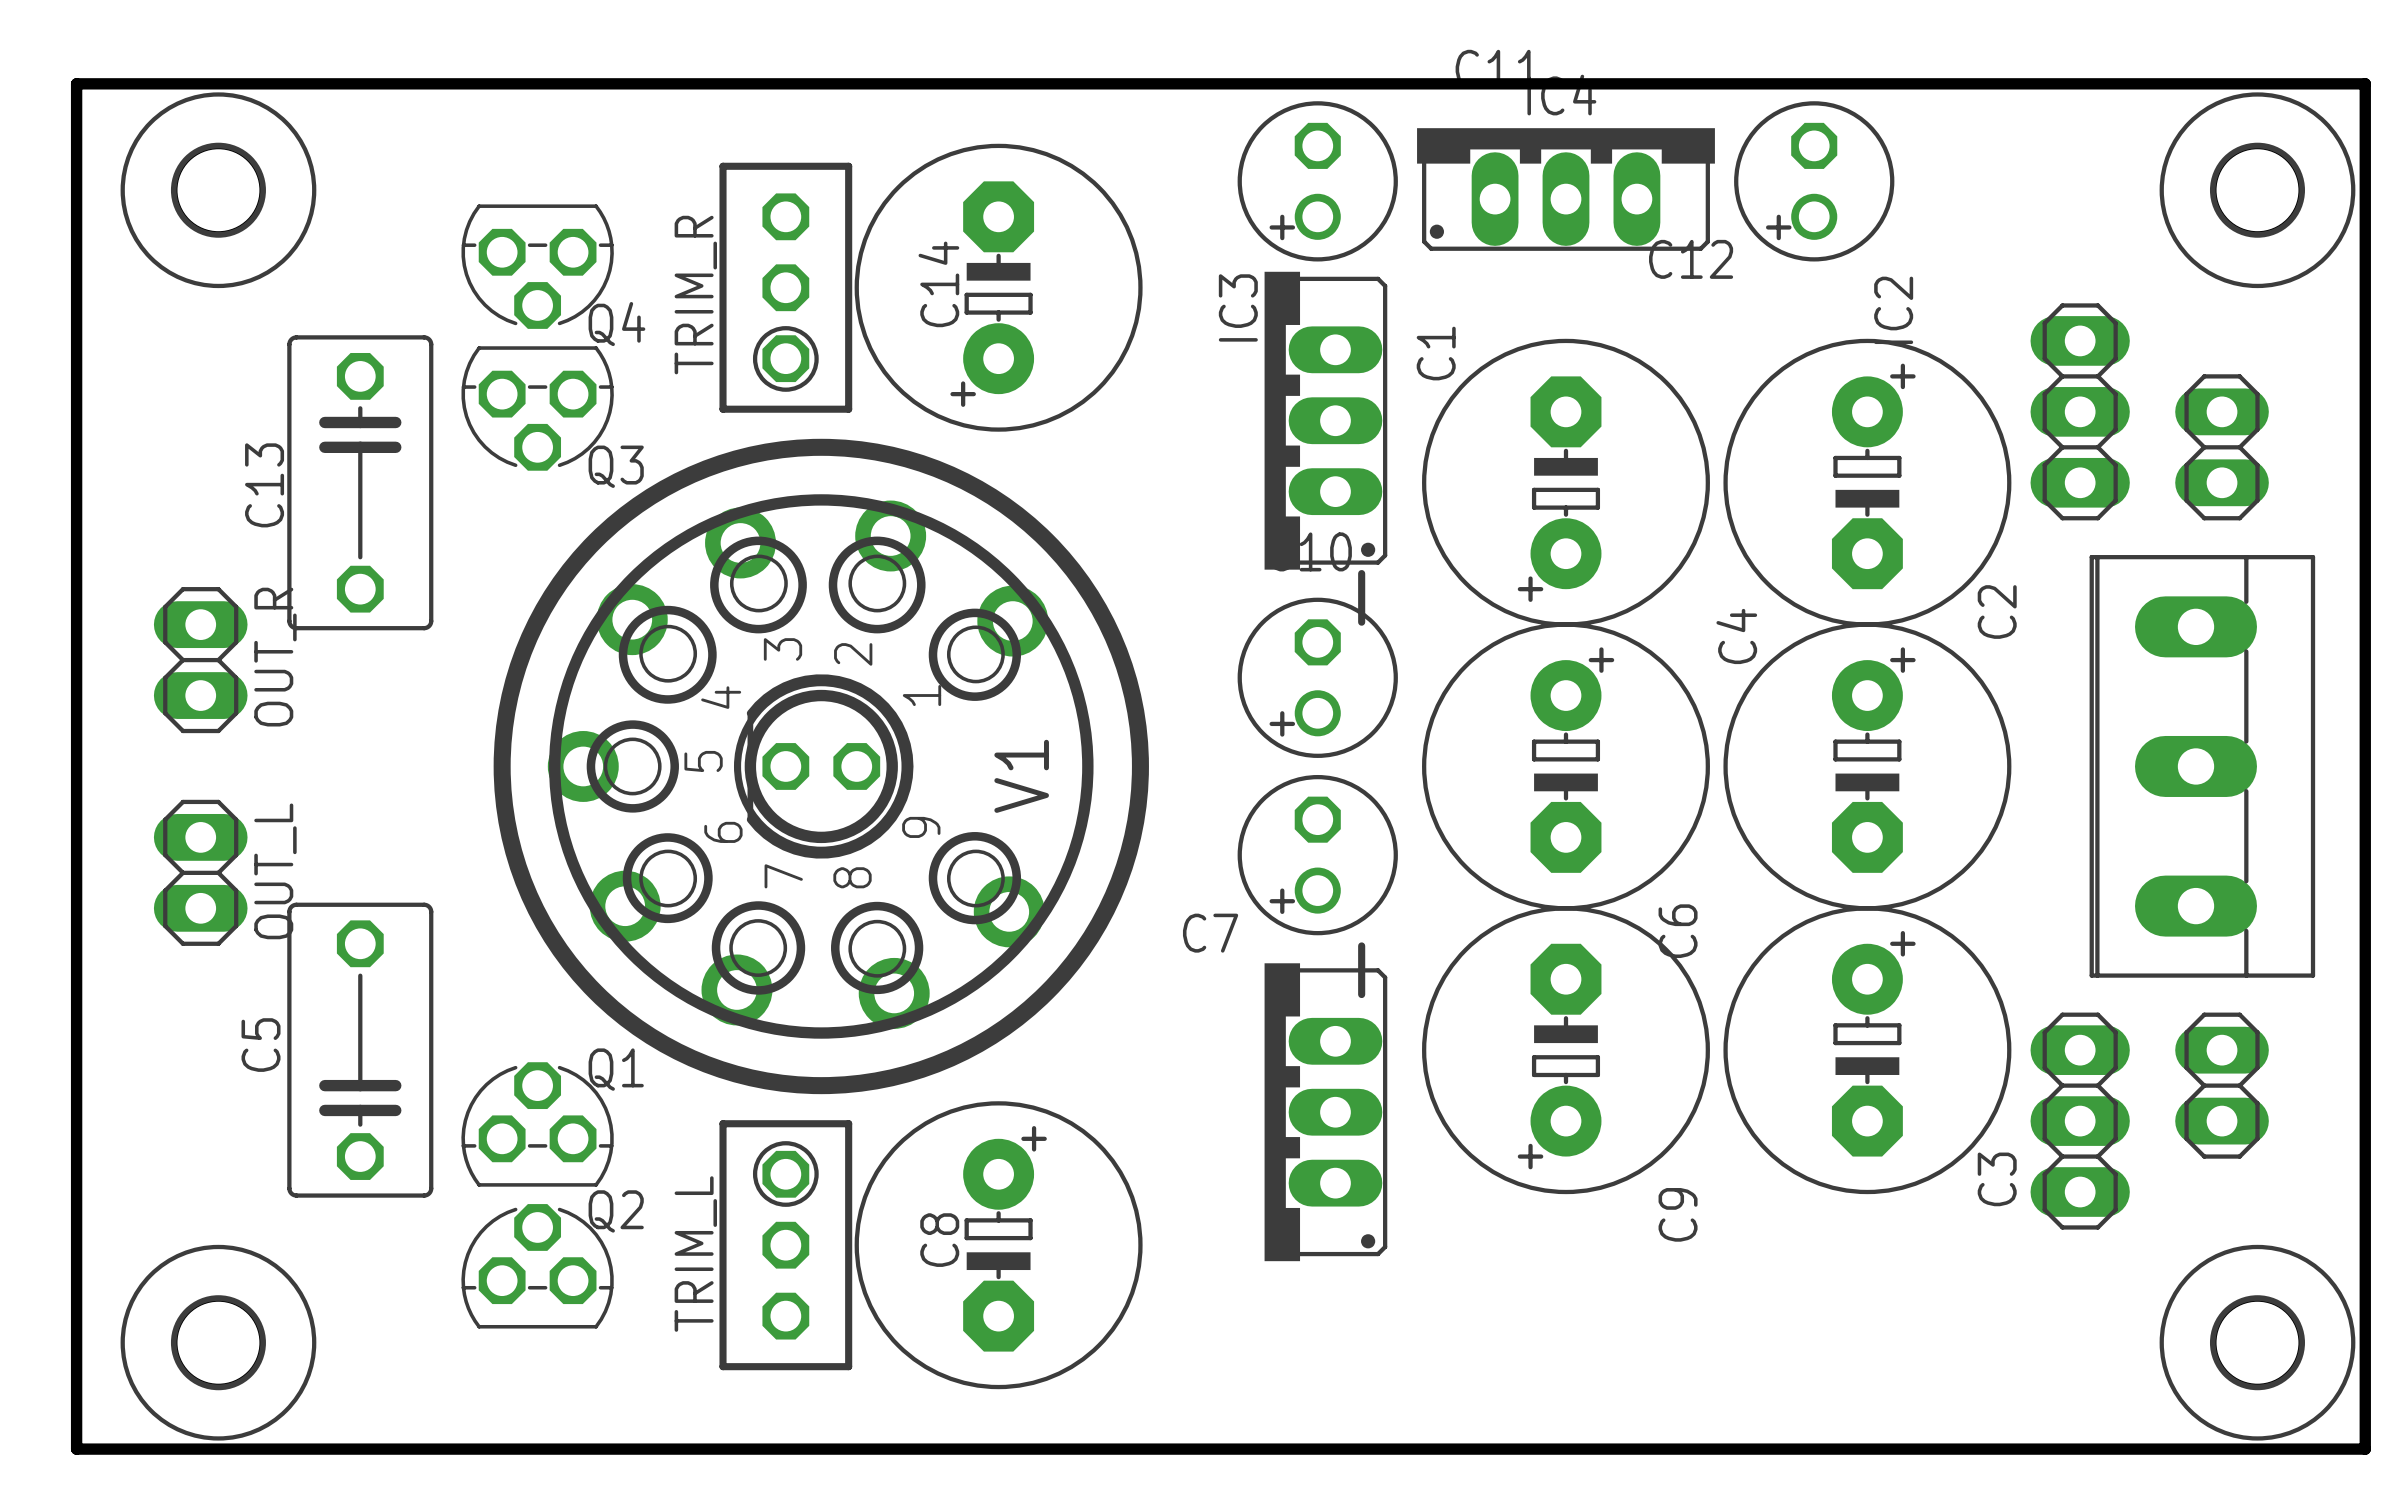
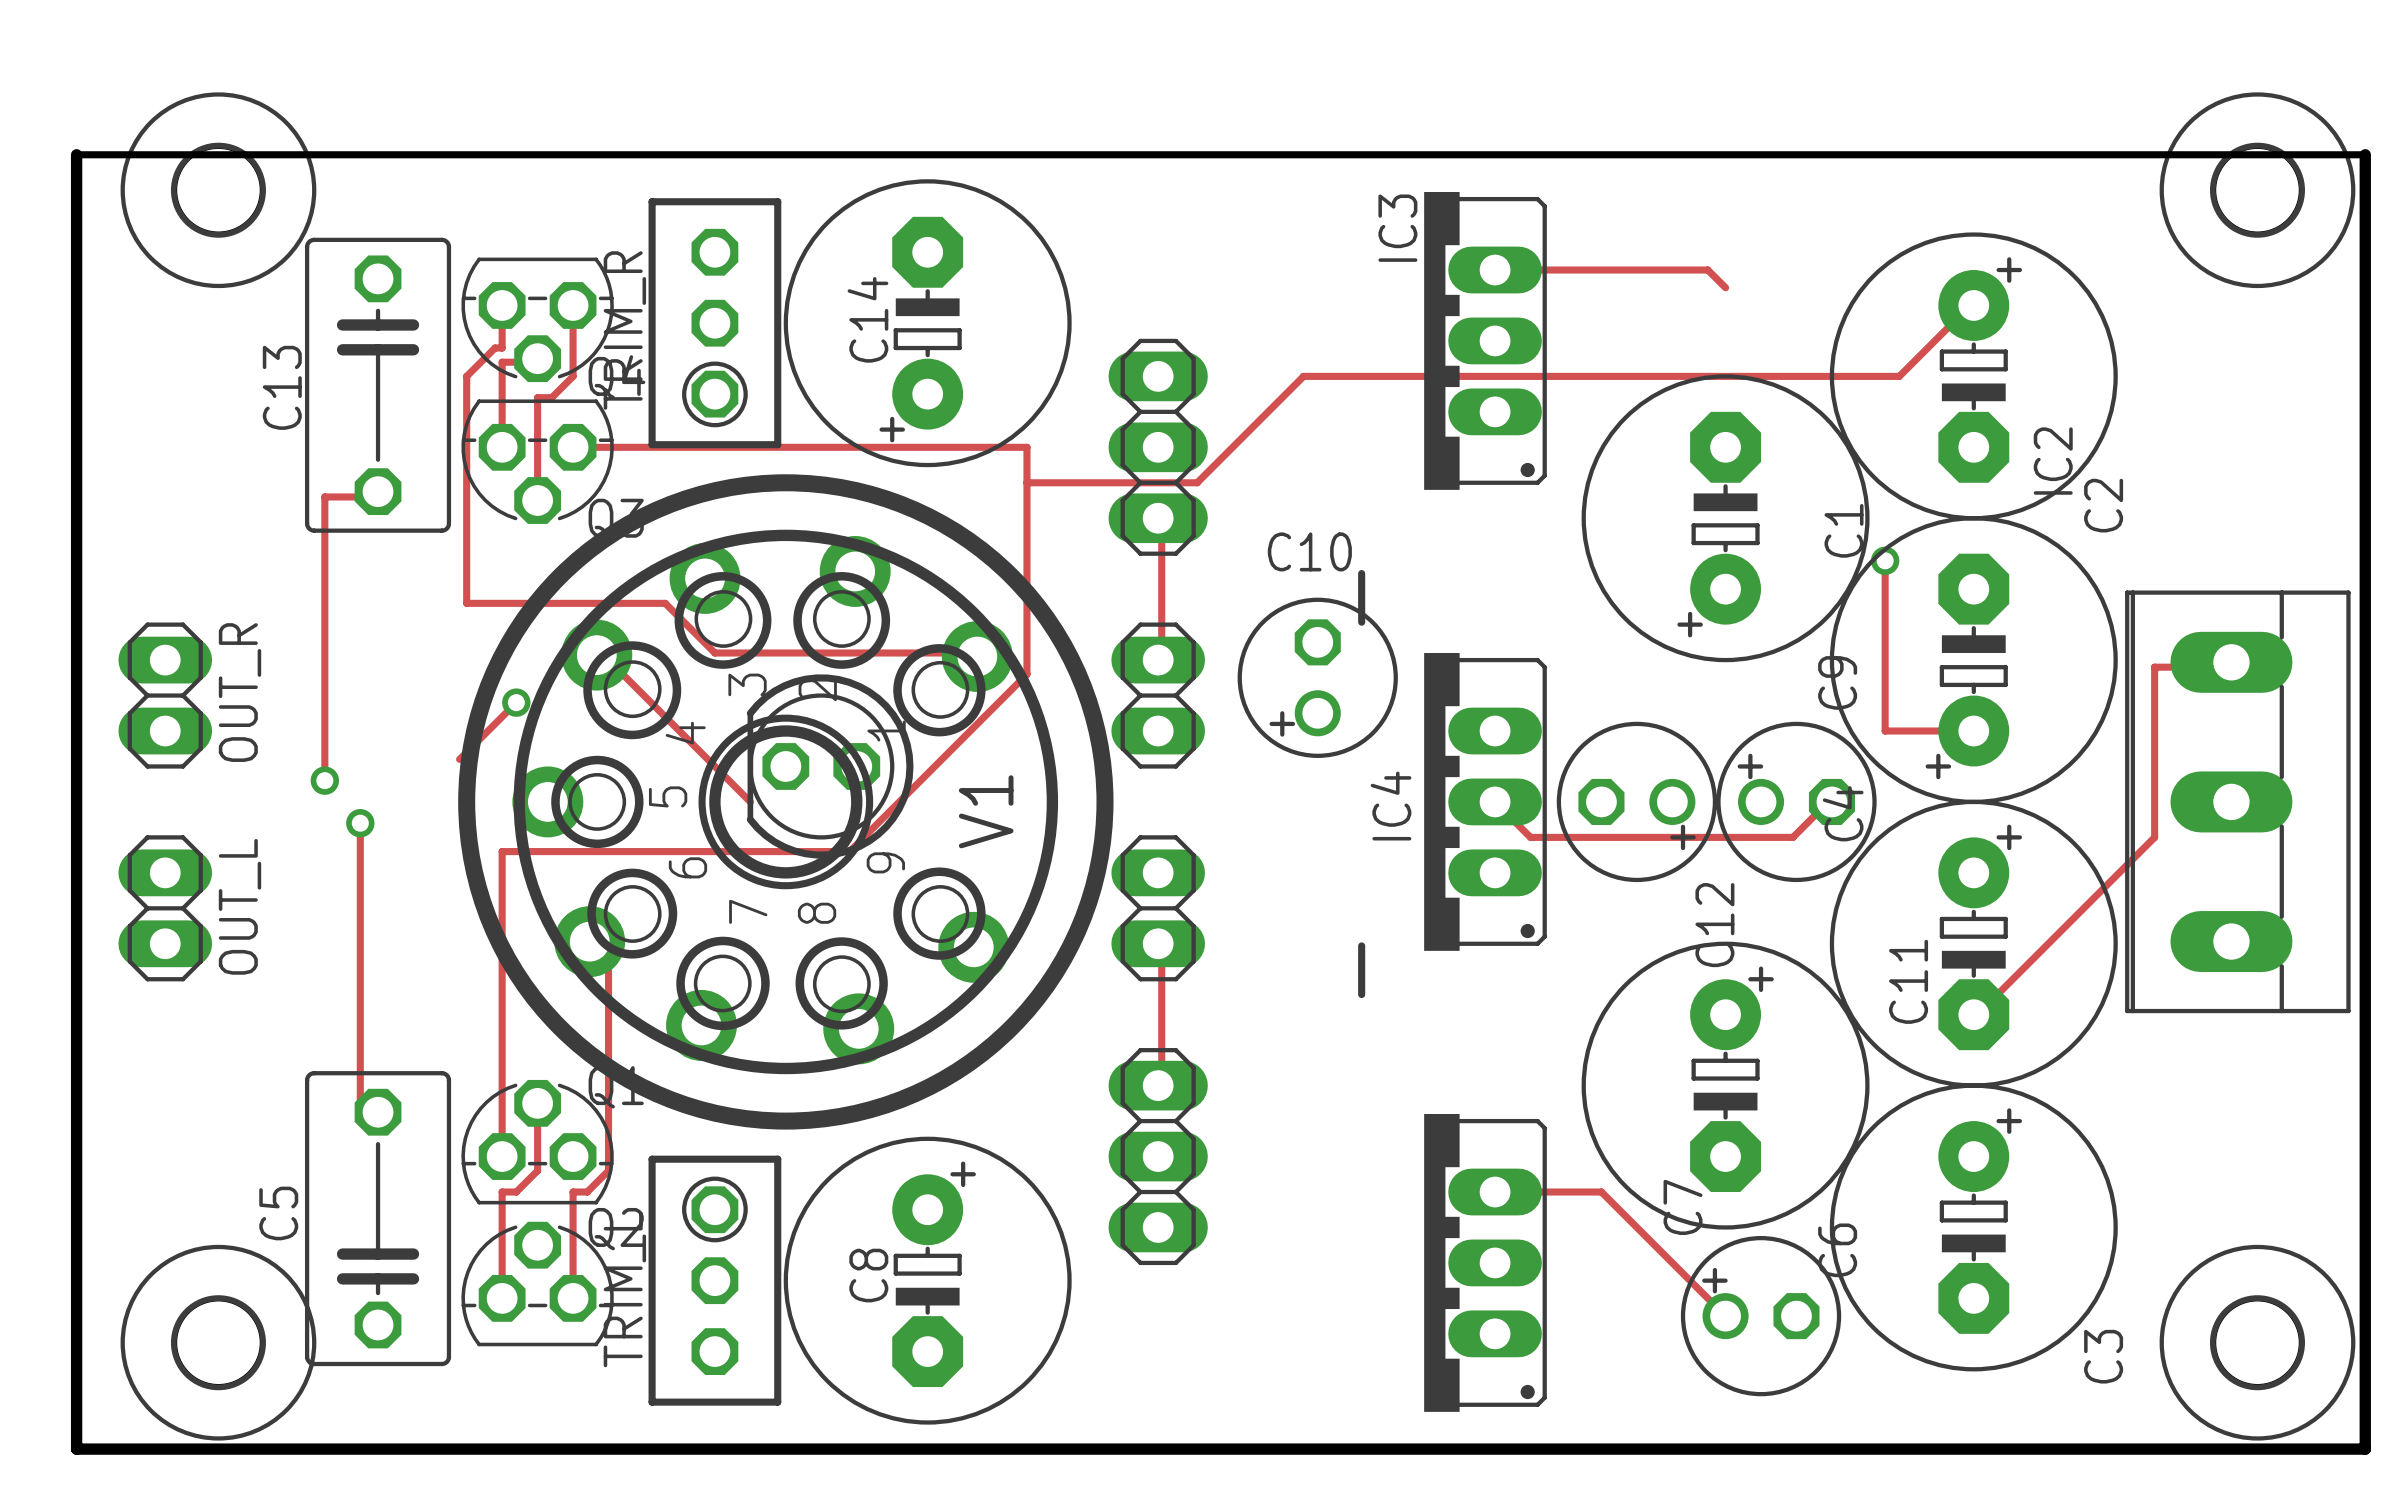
board edge: (76, 154) (76, 83) (2365, 83) (2365, 154) -> (76, 154) (2365, 154)
C11 rotation: 0° (1317, 181) -> 90° clockwise (1796, 801)
C11 position: (1317, 181) -> (1796, 801)
C12 rotation: 0° (1814, 181) -> 90° counterclockwise (1636, 801)
C12 position: (1814, 181) -> (1636, 801)
IC4 rotation: 0° (1565, 189) -> 90° counterclockwise (1485, 801)
IC4 position: (1565, 189) -> (1485, 801)
Q4 position: (537, 266) -> (537, 319)
track: none -> (1495, 270) (1707, 270) (1725, 287)
TRIM_R position: (785, 287) -> (714, 323)
C14 position: (998, 287) -> (927, 323)
track: none -> (502, 305) (502, 348) (495, 348) (466, 376) (466, 603) (665, 603) (714, 652) (977, 652) (977, 656)
track: none -> (573, 305) (573, 376) (551, 397) (537, 397) (537, 500)
track: none -> (1973, 305) (1970, 305) (1899, 376) (1303, 376) (1197, 482) (1026, 482)
track: none -> (537, 358) (537, 362) (502, 362) (502, 447)
Q3 position: (537, 408) -> (537, 461)
part: (2080, 411) -> none
IC3 position: (1325, 420) -> (1485, 340)
track: none -> (573, 447) (1026, 447) (1026, 674) (849, 851) (502, 851) (502, 1156)
part: none -> (1158, 447)
part: (2222, 447) -> none
C13 position: (360, 482) -> (378, 385)
C1 position: (1565, 482) -> (1973, 660)
C2 position: (1867, 482) -> (1973, 376)
track: none -> (378, 491) (374, 496) (324, 496) (324, 780)
track: none -> (1158, 518) (1161, 518) (1161, 660) (1158, 660)
track: none -> (1885, 560) (1885, 731) (1973, 731)
via: none -> (1885, 560)
track: none -> (596, 655) (601, 660) (608, 660) (750, 801)
OUT_R position: (200, 660) -> (165, 695)
track: none -> (2231, 662) (2225, 667) (2154, 667) (2154, 837) (1977, 1014) (1973, 1014)
part: none -> (1158, 695)
track: none -> (516, 702) (459, 759)
via: none -> (516, 702)
V1 position: (821, 766) -> (785, 801)
C6 position: (1565, 766) -> (1725, 1085)
C4 position: (1867, 766) -> (1973, 943)
part position: (2202, 766) -> (2237, 801)
via: none -> (324, 780)
track: none -> (1495, 801) (1530, 837) (1792, 837) (1828, 801) (1831, 801)
track: none -> (360, 823) (360, 1106) (374, 1106) (378, 1112)
via: none -> (360, 823)
C7 rotation: 0° (1317, 855) -> 90° clockwise (1761, 1316)
C7 position: (1317, 855) -> (1761, 1316)
OUT_L position: (200, 872) -> (165, 908)
part: none -> (1158, 908)
track: none -> (589, 941) (594, 943) (608, 943) (608, 1170) (587, 1192) (573, 1192) (573, 1298)
track: none -> (1158, 943) (1161, 943) (1161, 1085) (1158, 1085)
C5 position: (360, 1050) -> (378, 1218)
C9 position: (1565, 1050) -> (1725, 518)
C3 position: (1867, 1050) -> (1973, 1227)
part: (2222, 1085) -> none
track: none -> (537, 1103) (537, 1170) (516, 1192) (502, 1192) (502, 1298)
IC2 position: (1325, 1112) -> (1485, 1262)
part: (2080, 1121) -> none
Q1 position: (537, 1124) -> (537, 1142)
part: none -> (1158, 1156)
track: none -> (1495, 1192) (1601, 1192) (1725, 1316)
TRIM_L position: (785, 1245) -> (714, 1280)
C8 position: (998, 1245) -> (927, 1280)
Q2 position: (537, 1266) -> (537, 1284)

